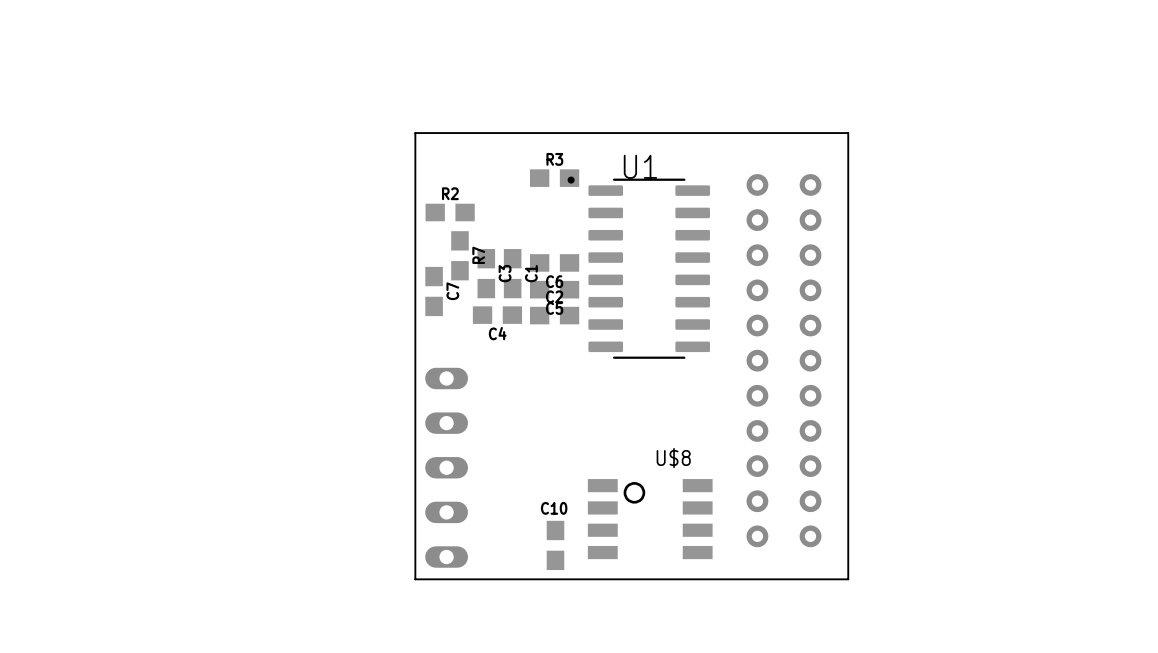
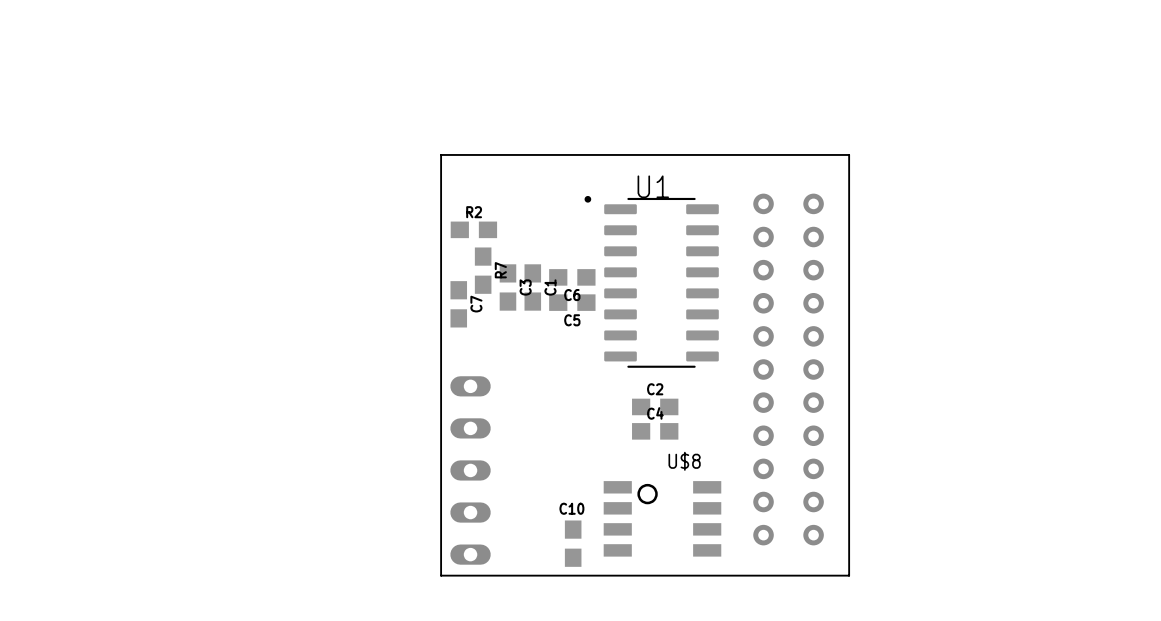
R3: (554, 178) -> none
C4 position: (497, 315) -> (655, 431)
C2 position: (554, 315) -> (655, 406)
C4 name position: C4 (497, 333) -> C4 (655, 413)

